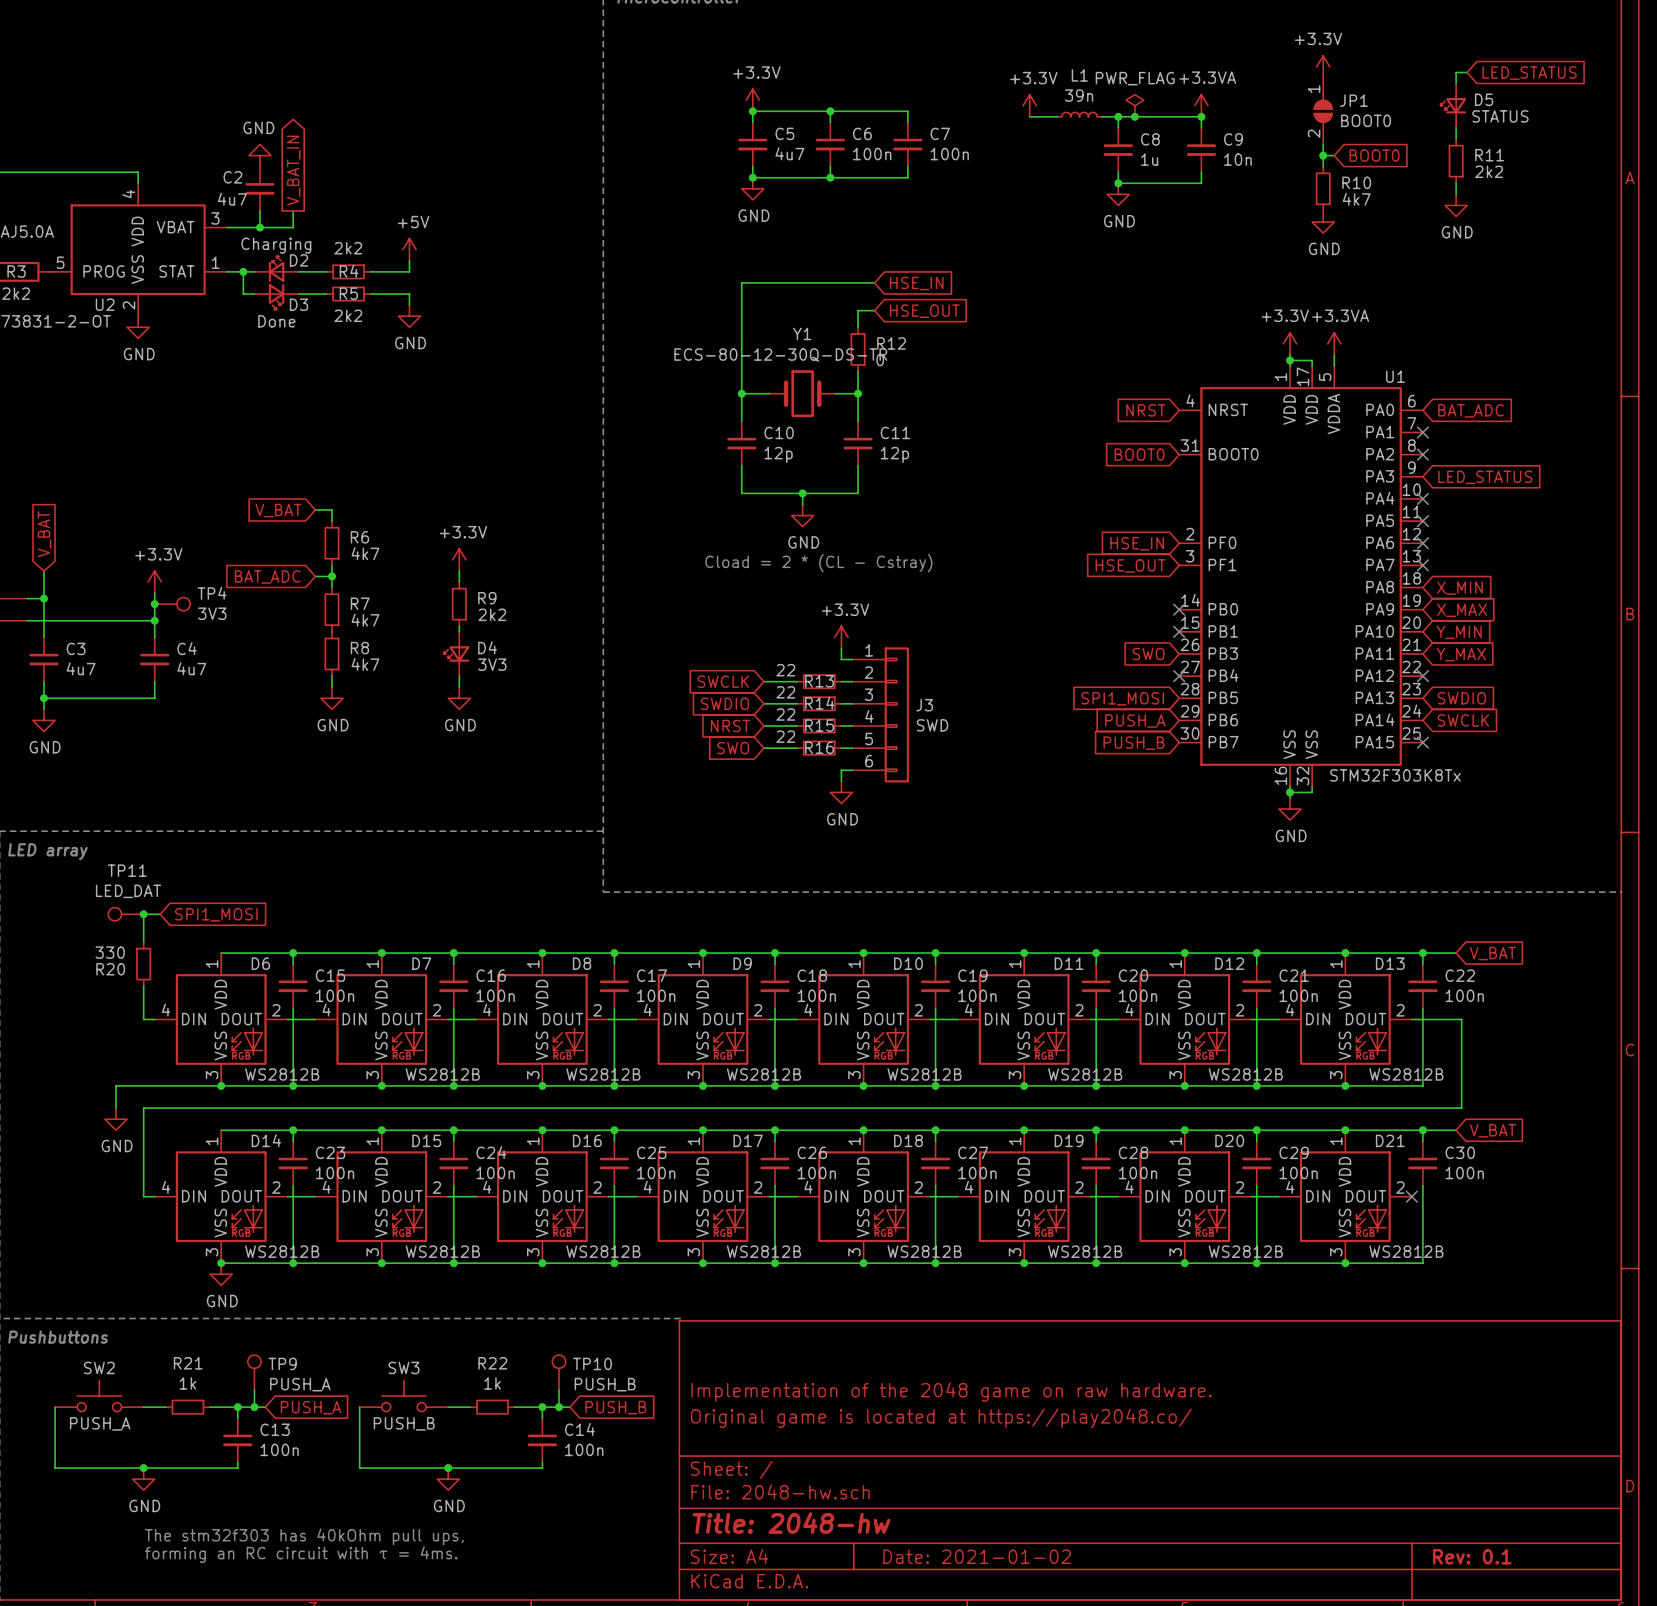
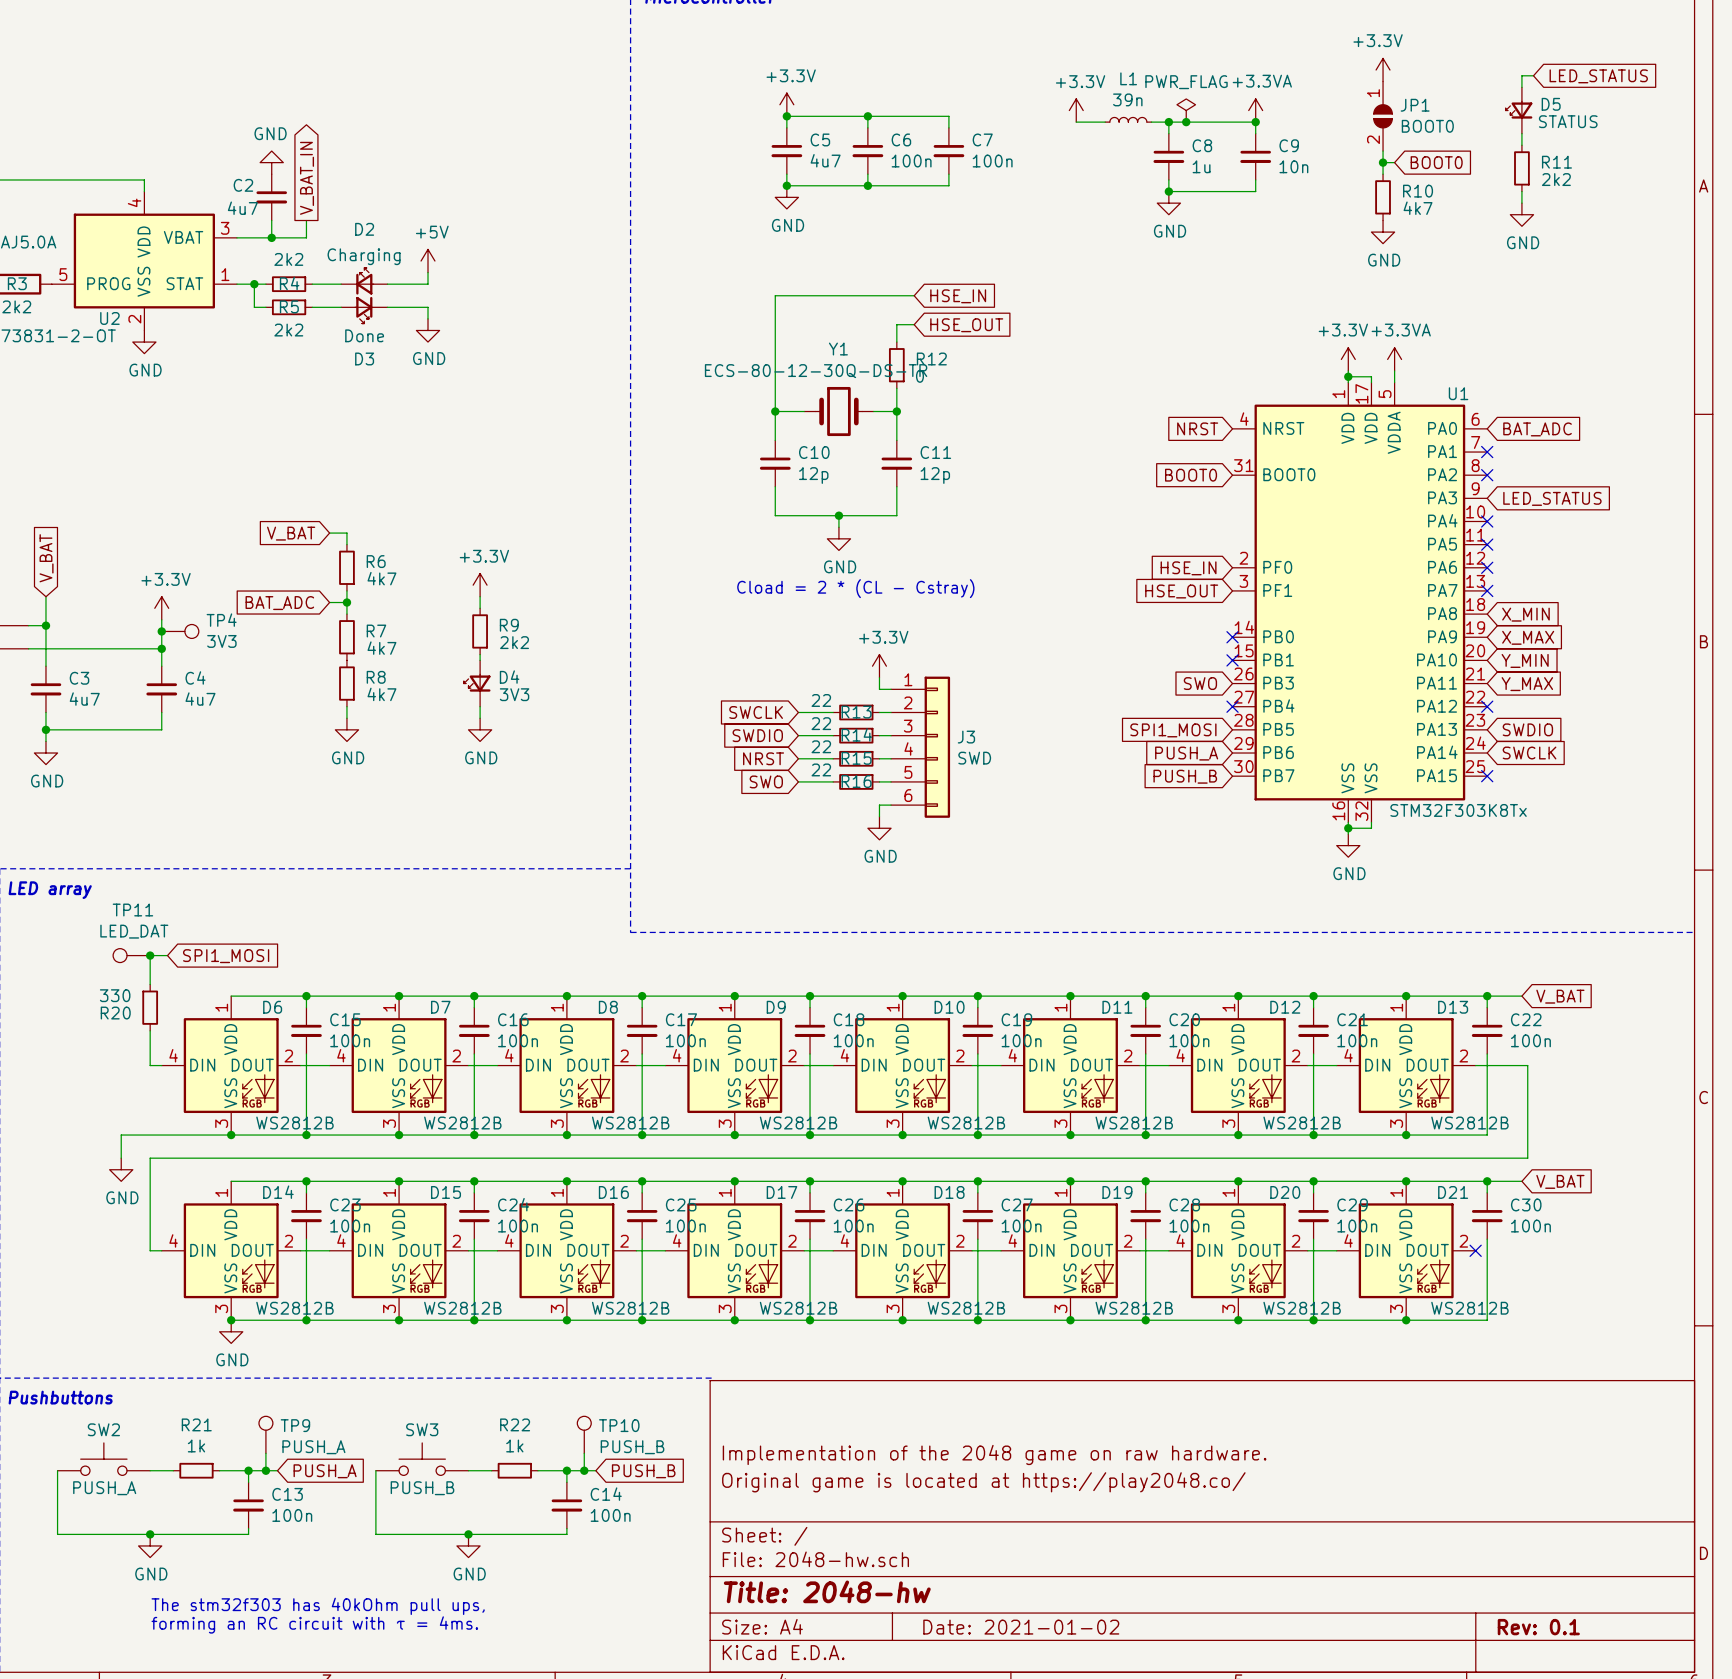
D2 name position: D2 (299, 260) -> D2 (364, 229)
D2 position: (276, 269) -> (364, 281)
R4 position: (348, 271) -> (289, 284)
R5 position: (348, 294) -> (289, 307)
D3 position: (276, 296) -> (364, 310)
D3 name position: D3 (299, 304) -> D3 (364, 358)

